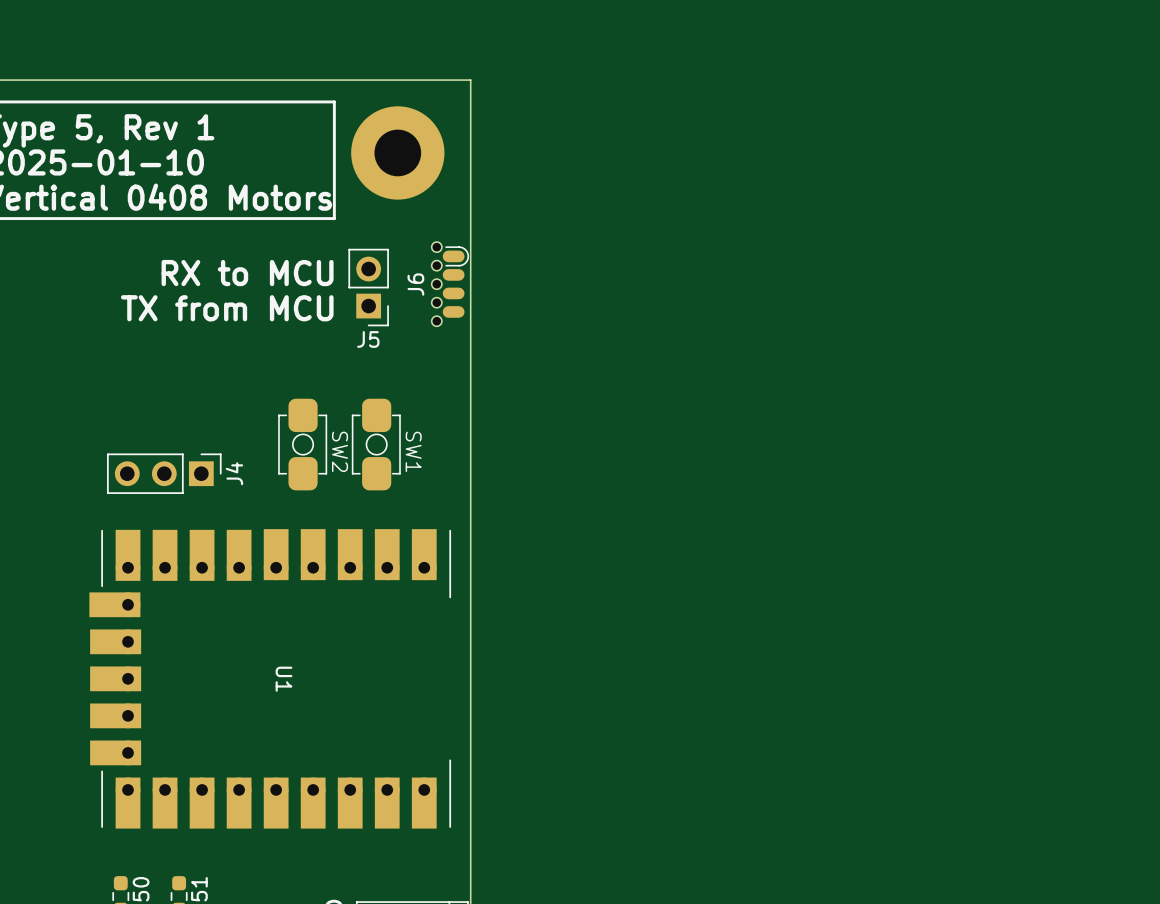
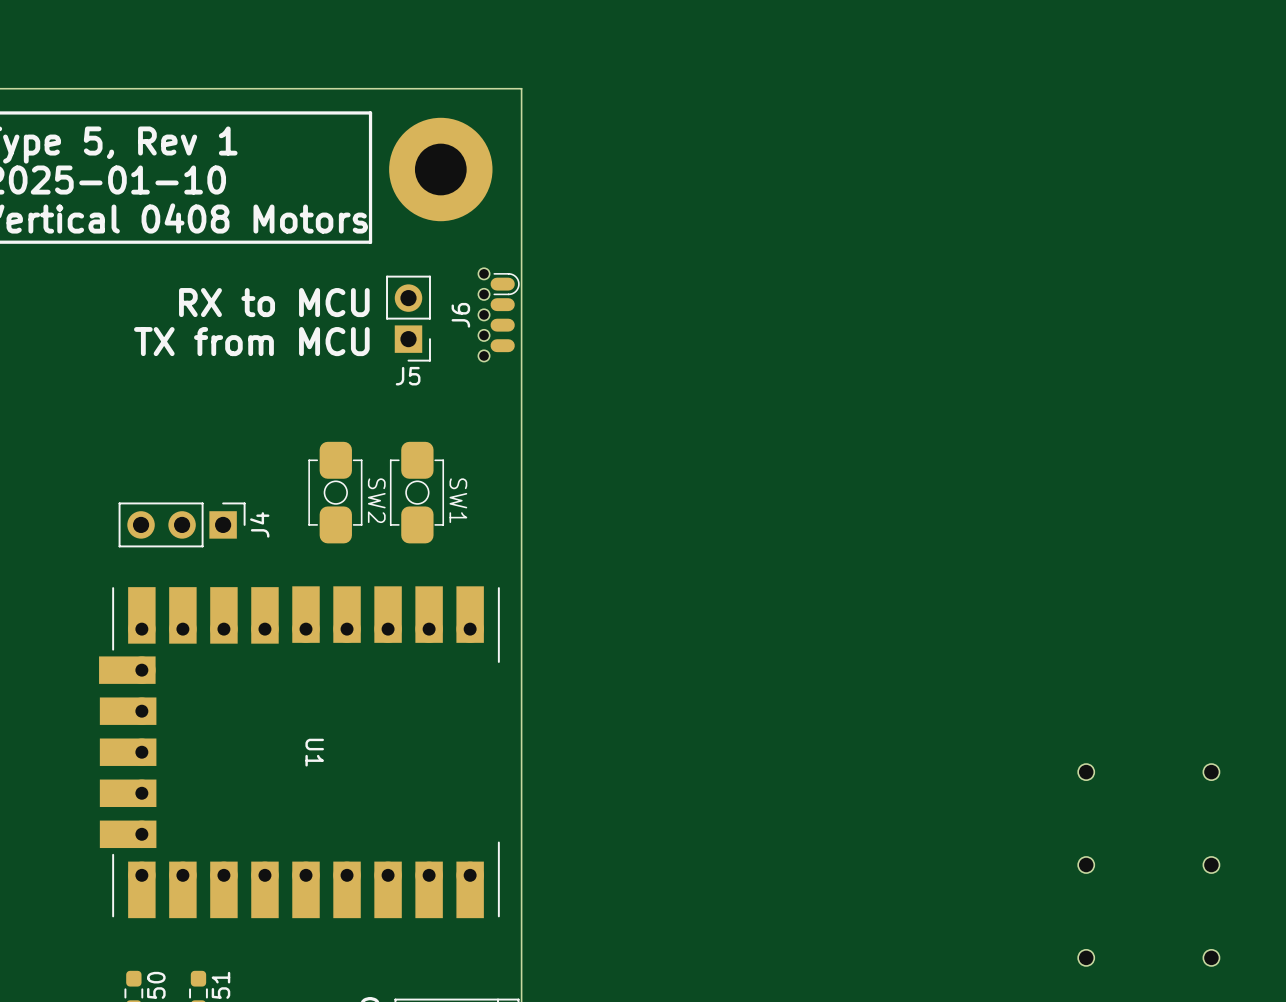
part: none -> (1086, 772)
part: none -> (1211, 772)
part: none -> (1086, 864)
part: none -> (1211, 864)
part: none -> (1086, 957)
part: none -> (1211, 957)

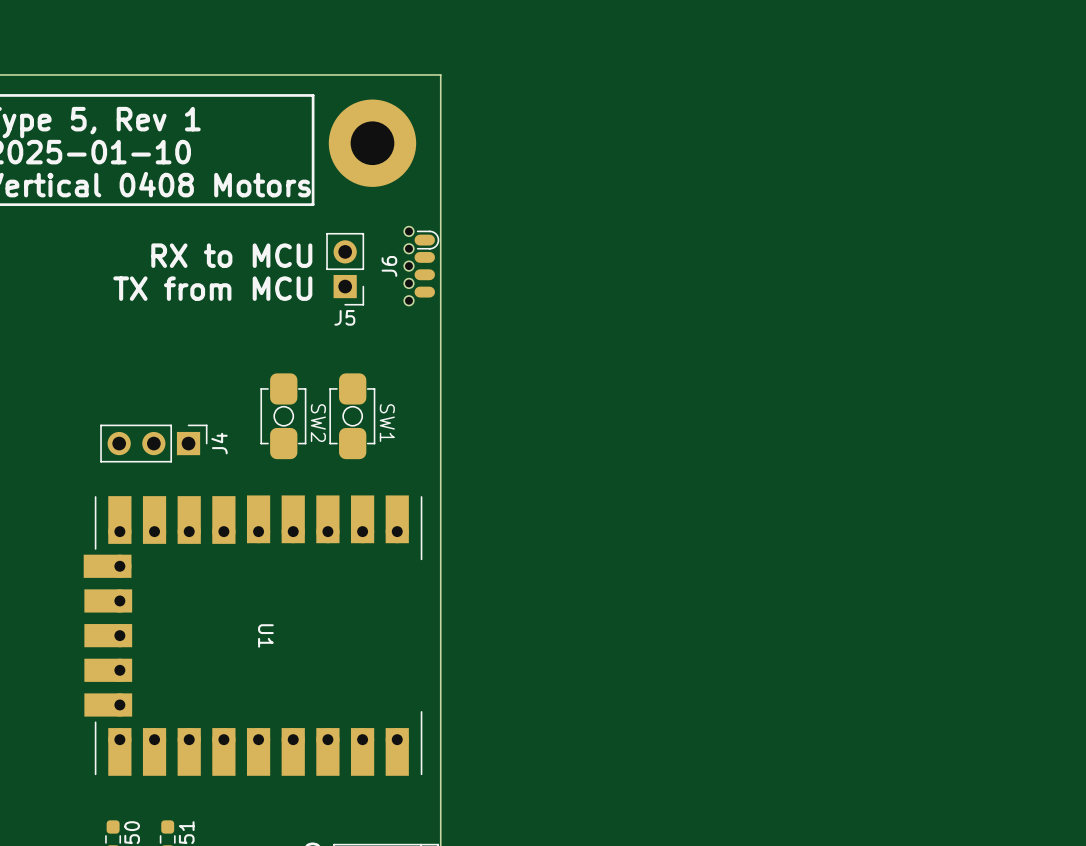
part: (1086, 772) -> none
part: (1211, 772) -> none
part: (1086, 864) -> none
part: (1211, 864) -> none
part: (1086, 957) -> none
part: (1211, 957) -> none

